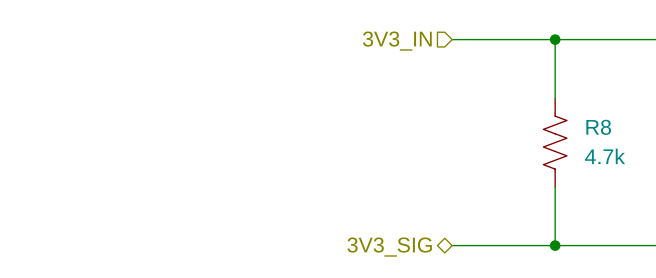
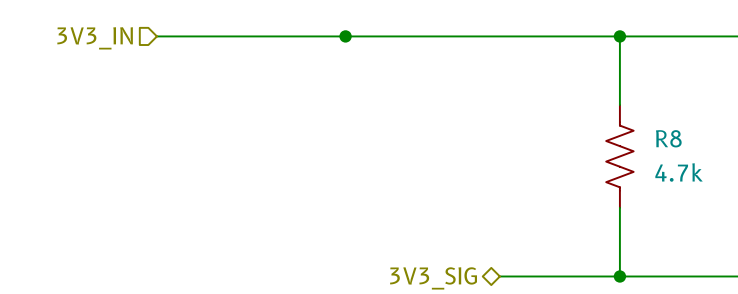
wire: none -> (156, 36) (499, 36)
junction: none -> (345, 36)
hierarchical label: none -> 3V3_IN (95, 38)
hierarchical label: 3V3_IN (397, 41) -> none

